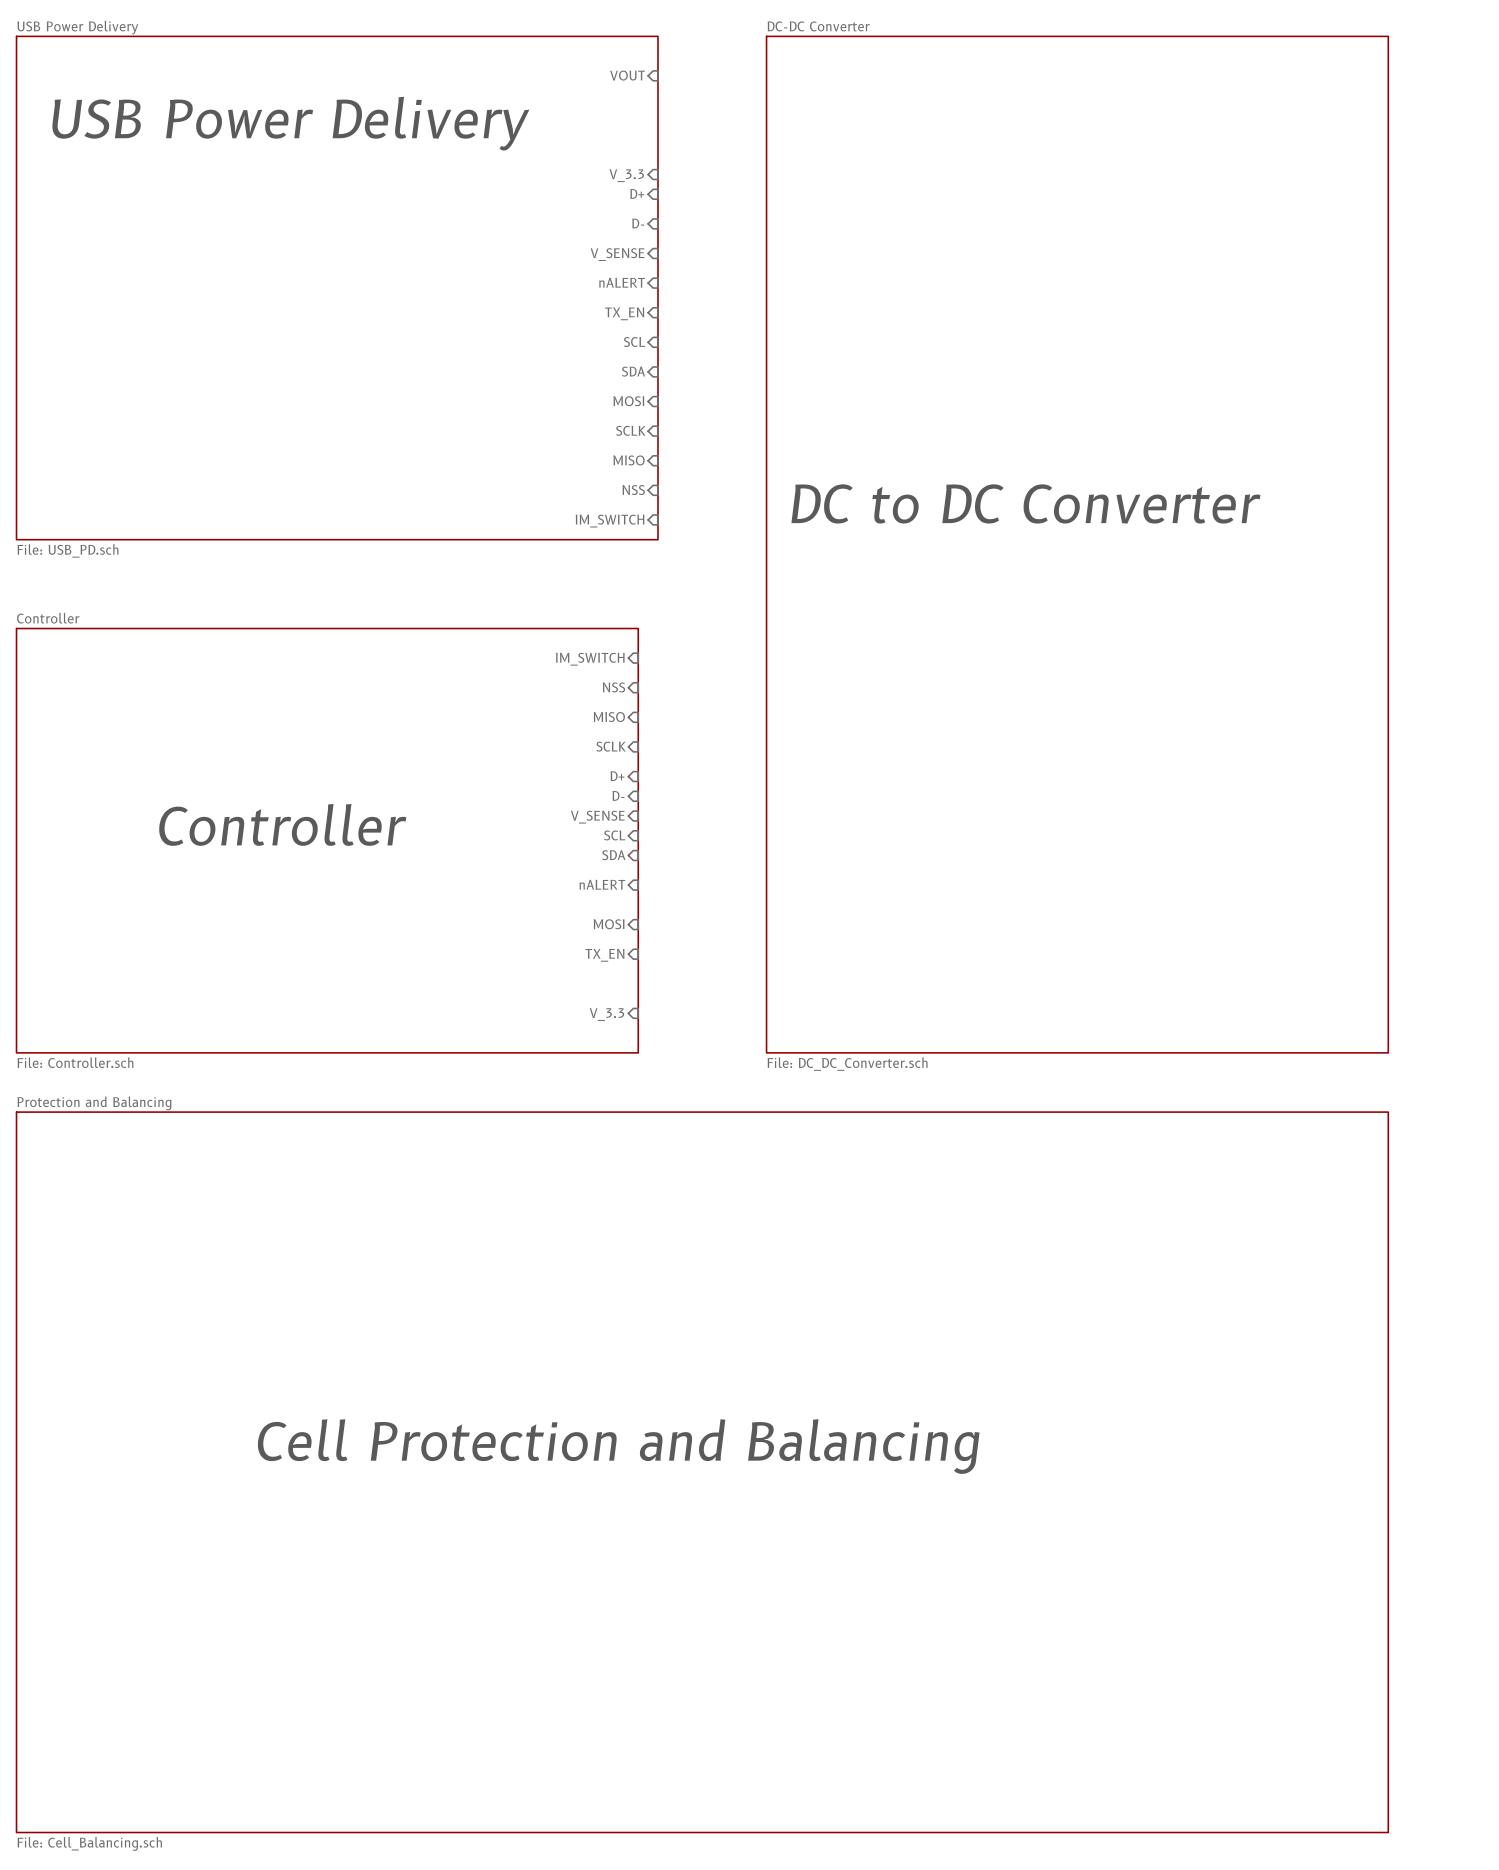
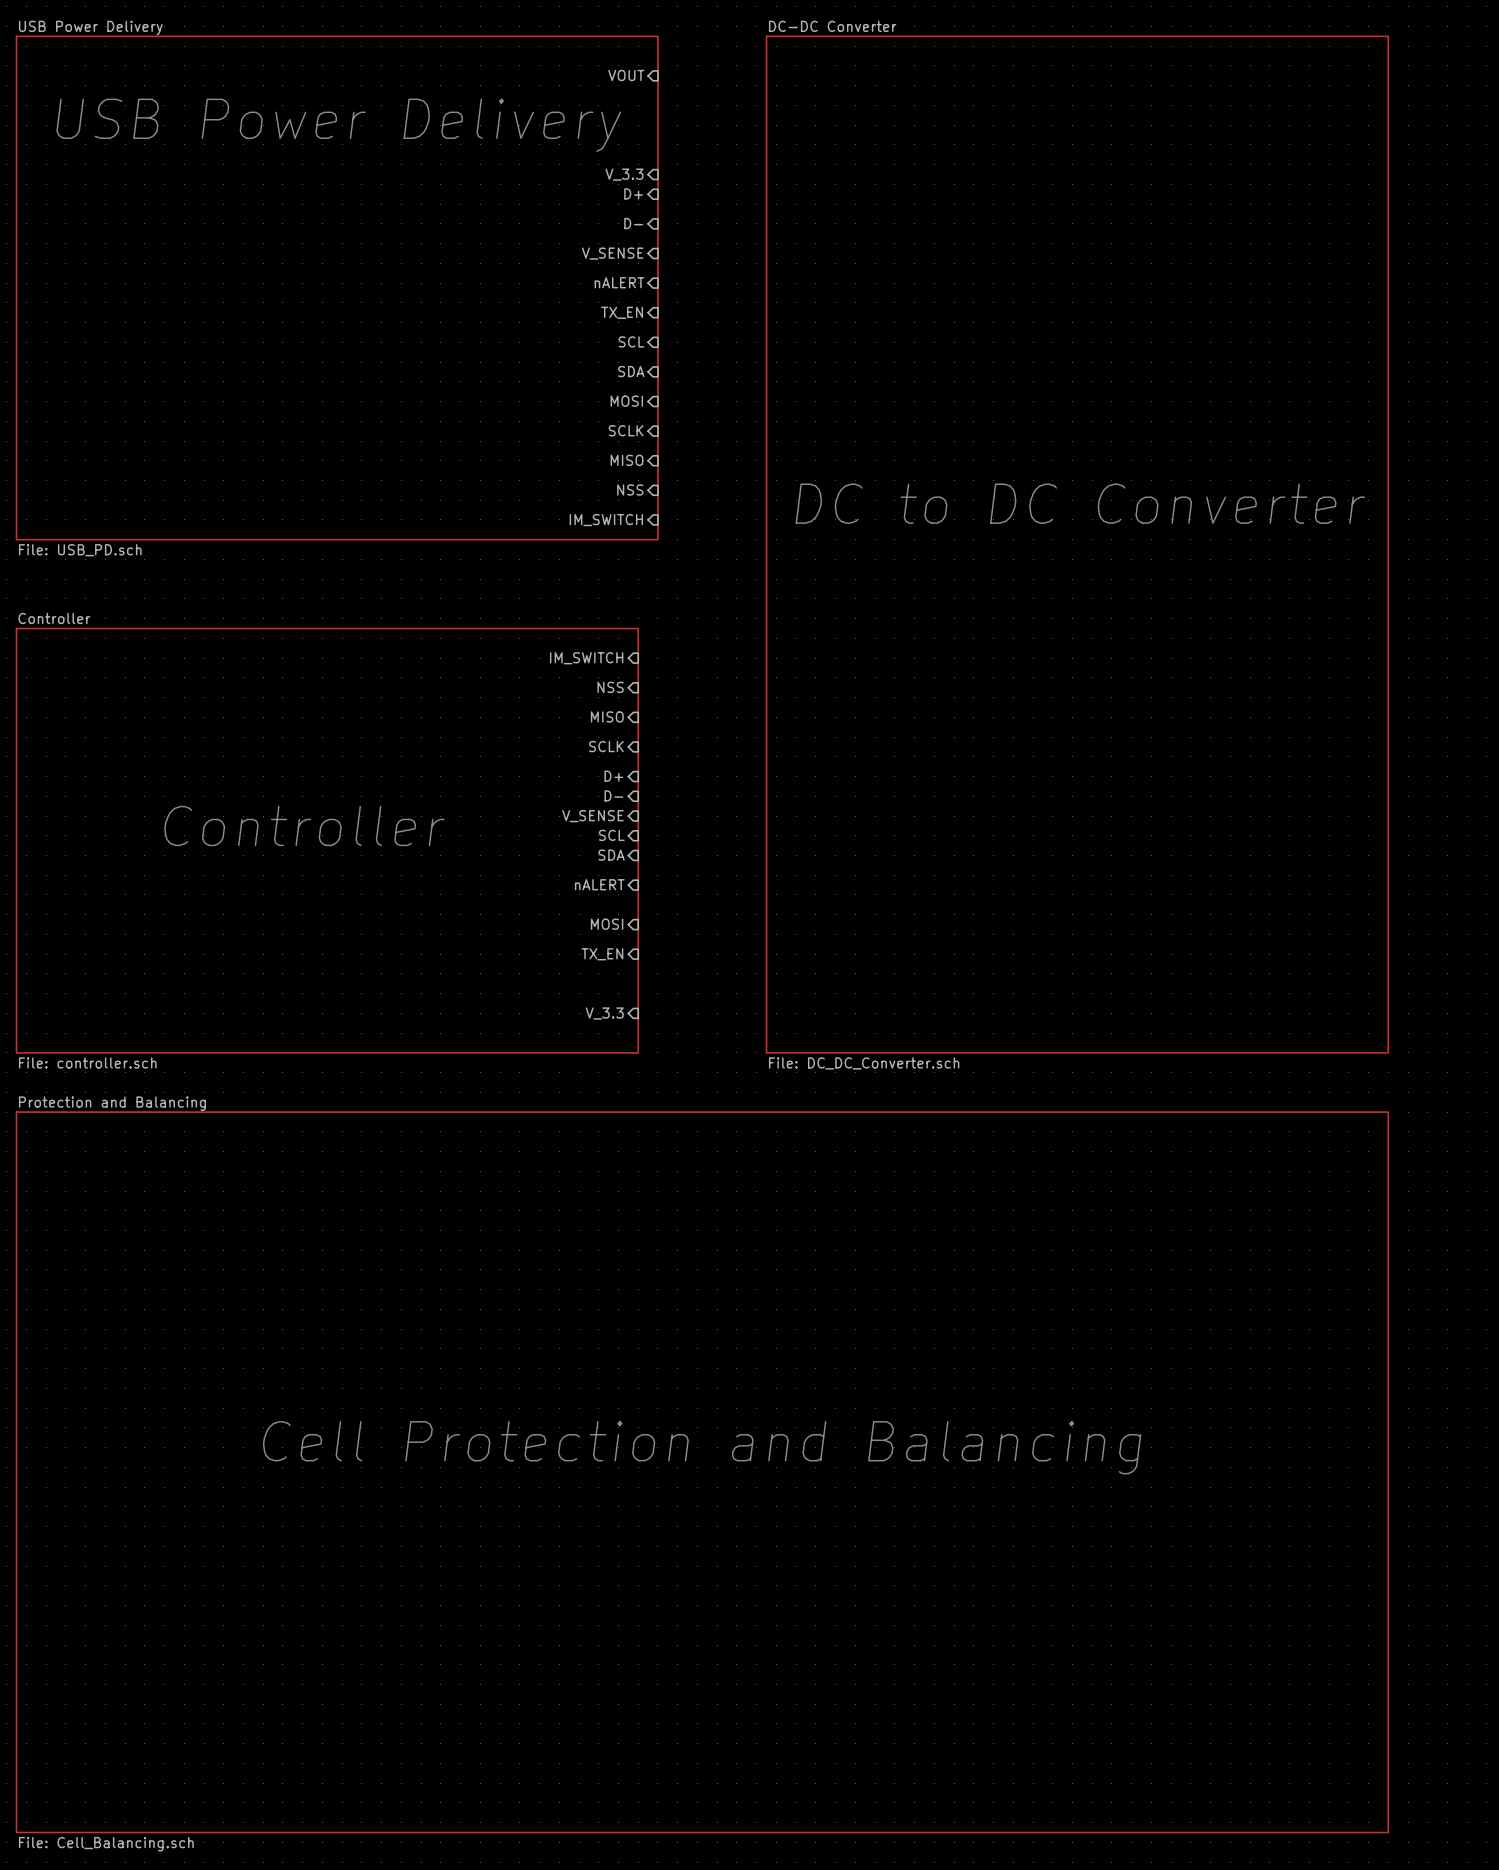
sheet Controller value: File: Controller.sch (75, 1062) -> File: controller.sch (87, 1062)

